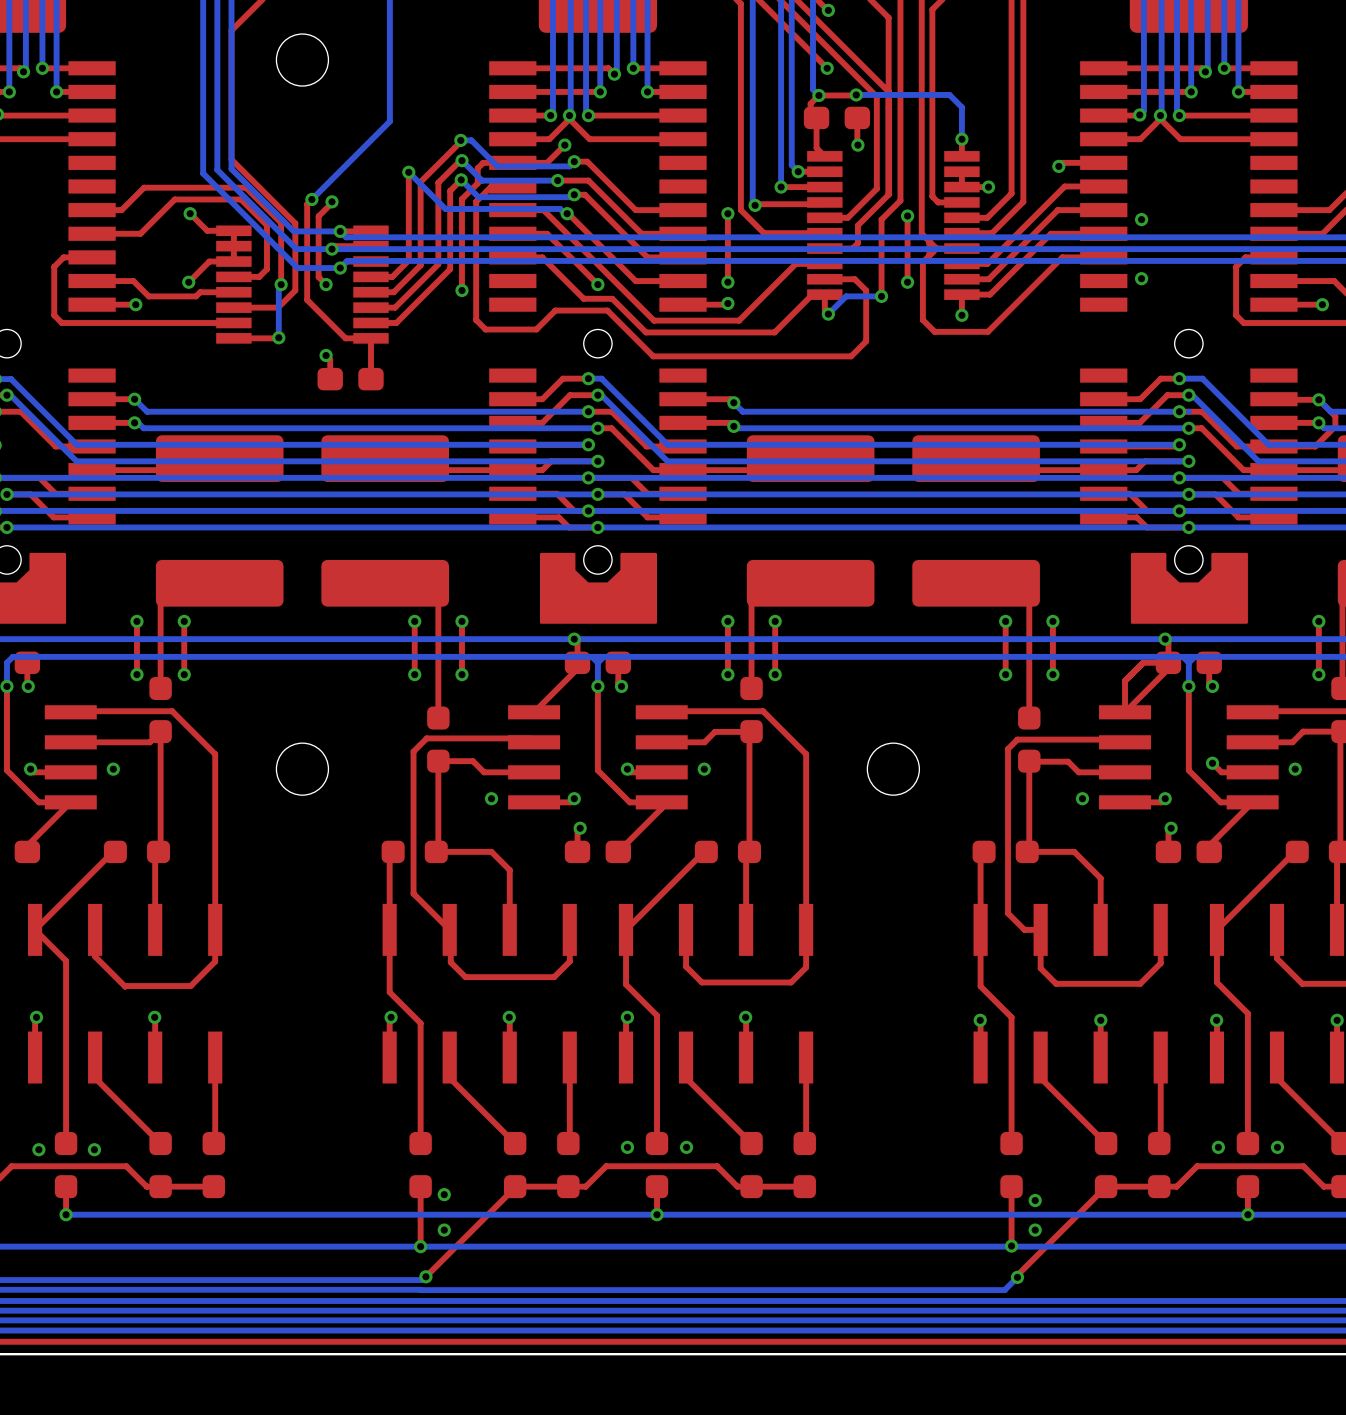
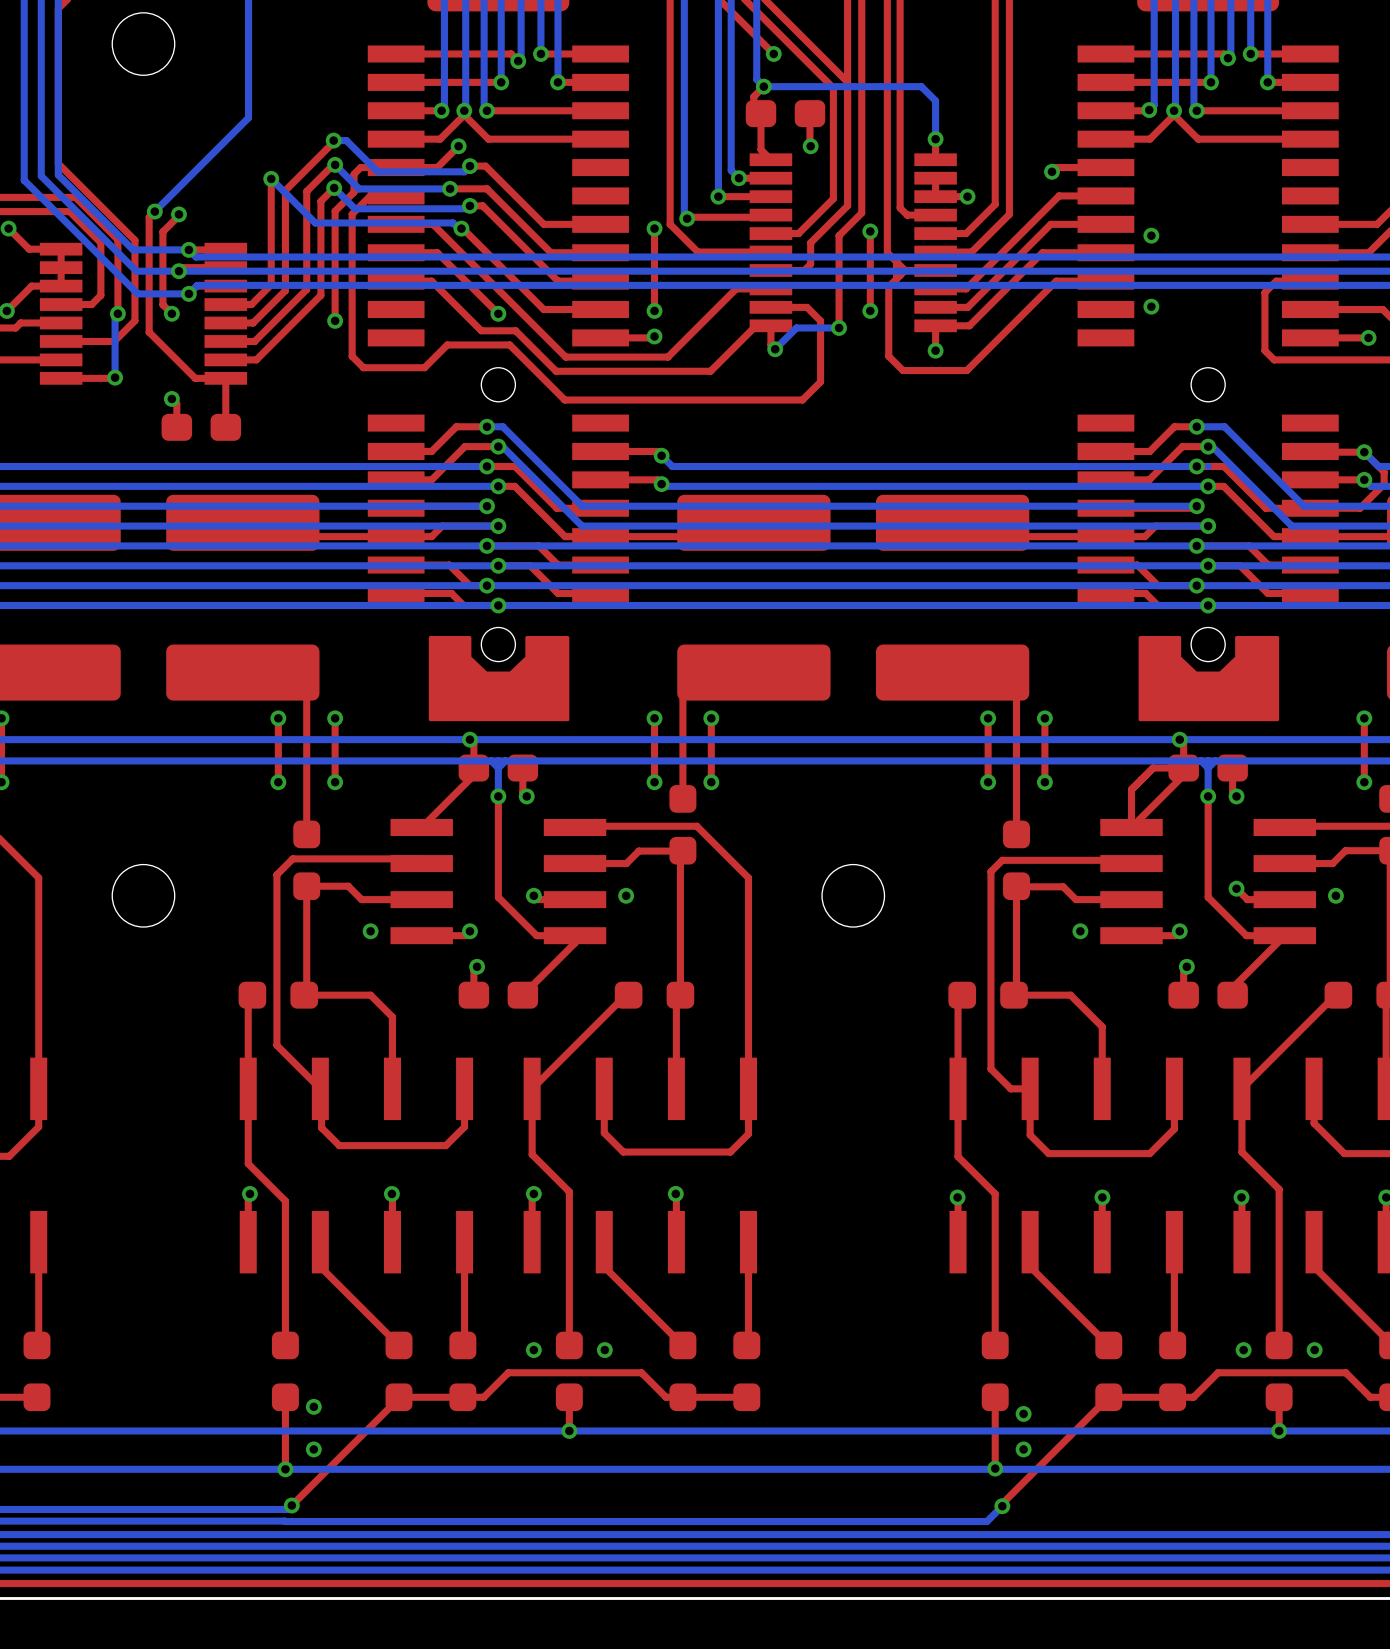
top track: (856, 94) (818, 95) -> none
bottom track: (856, 94) (950, 95) -> (763, 86) (921, 86)
via: (856, 94) -> none

